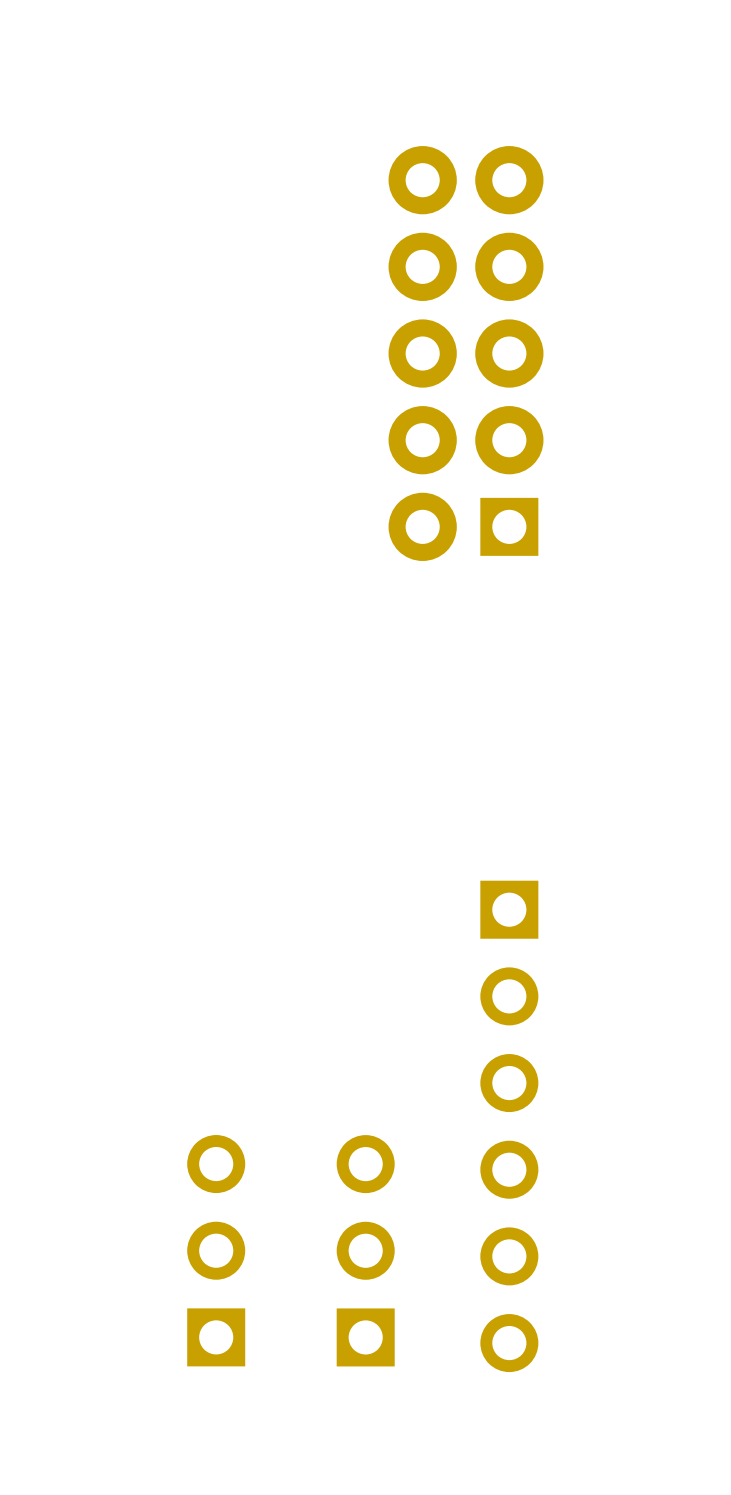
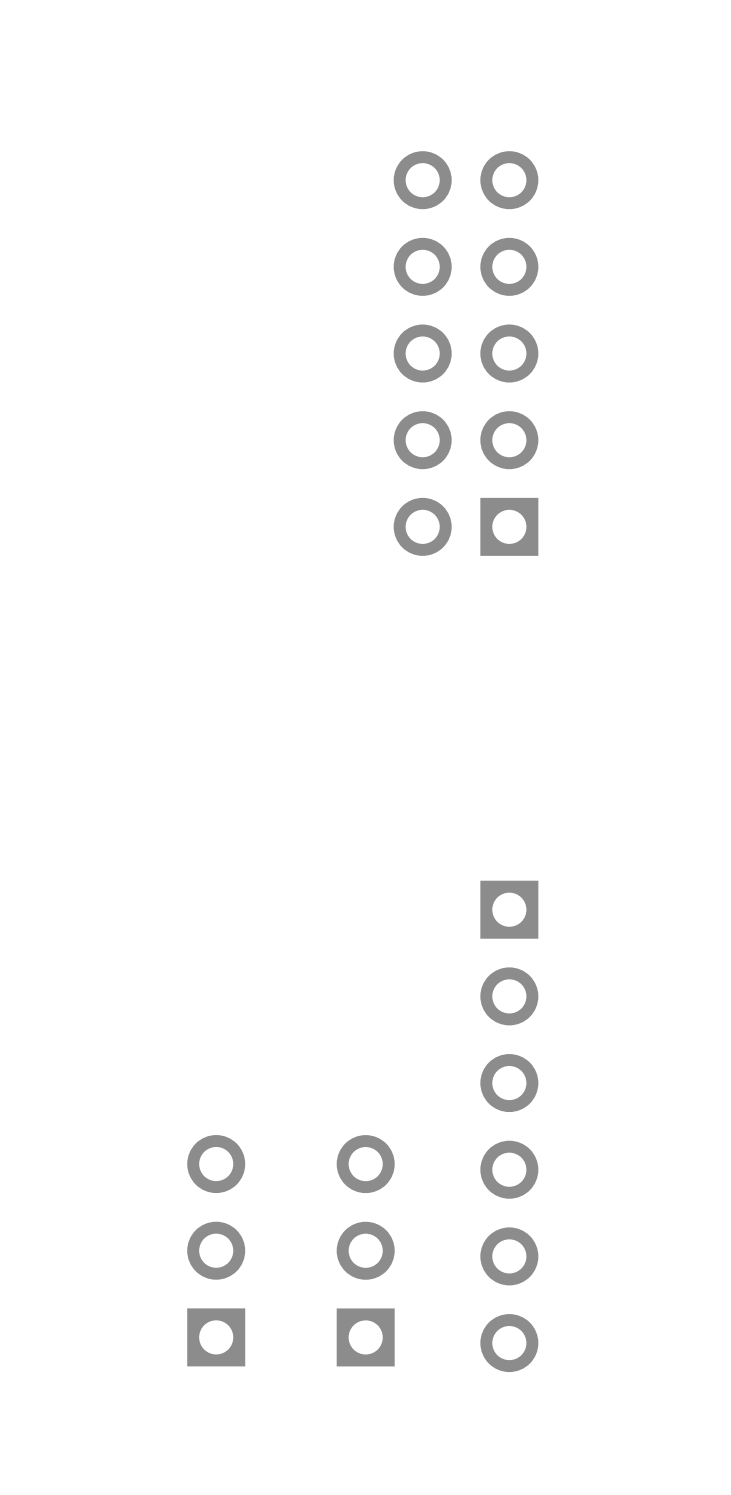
part footprint: [388, 146, 544, 561] -> [393, 151, 539, 556]

